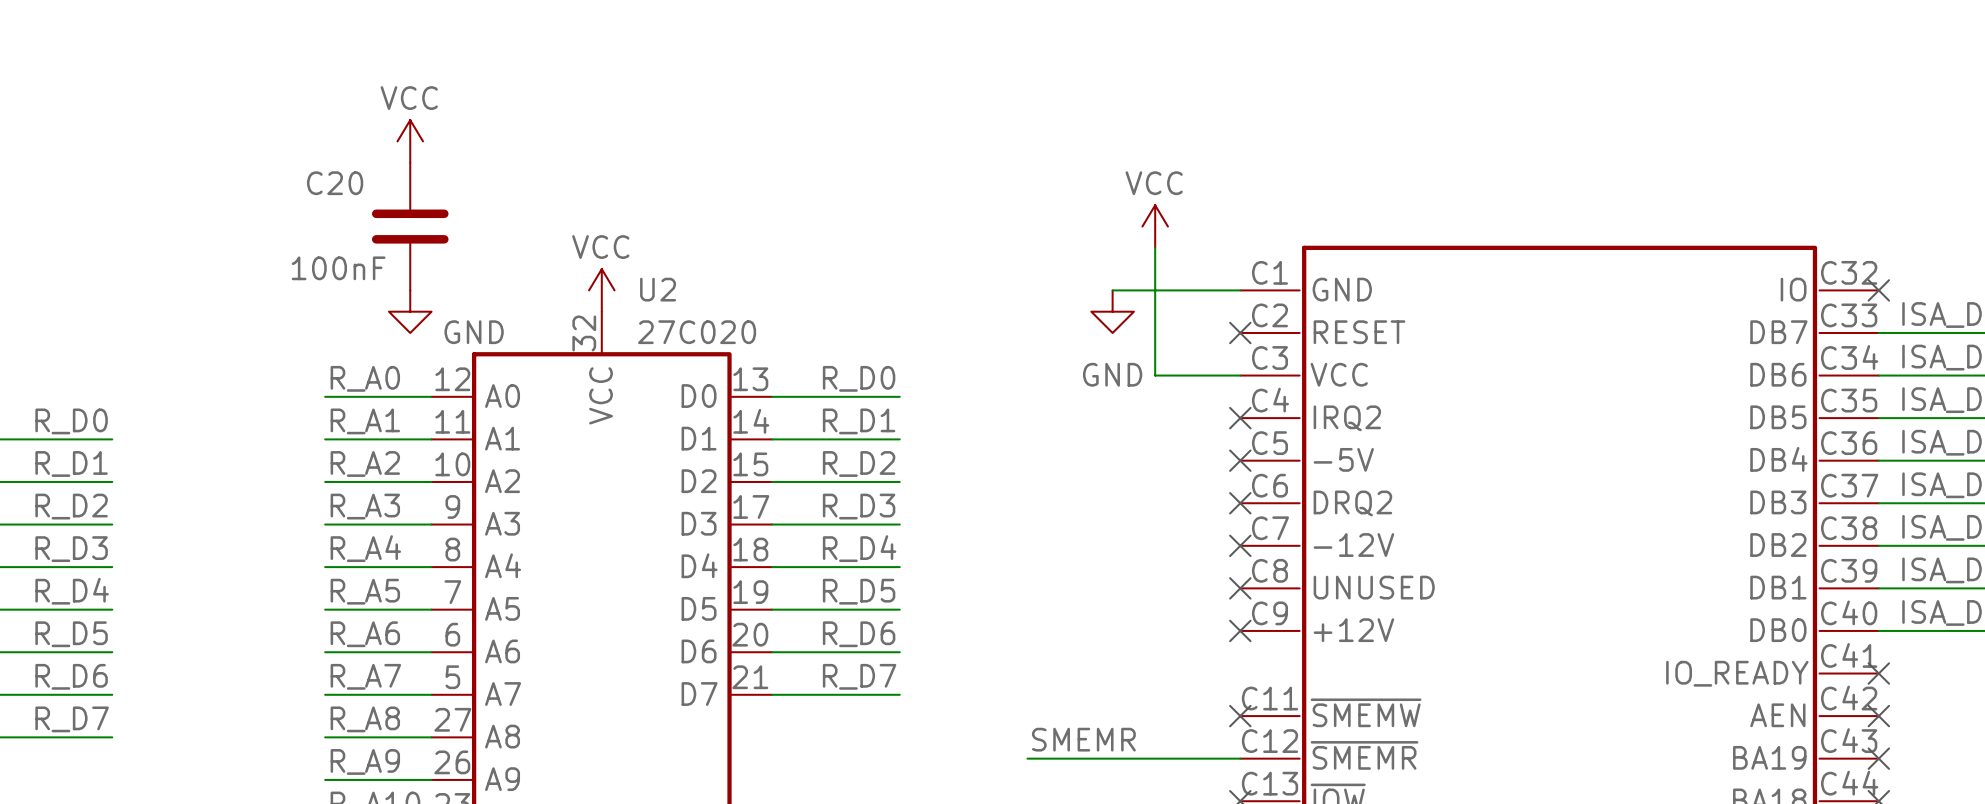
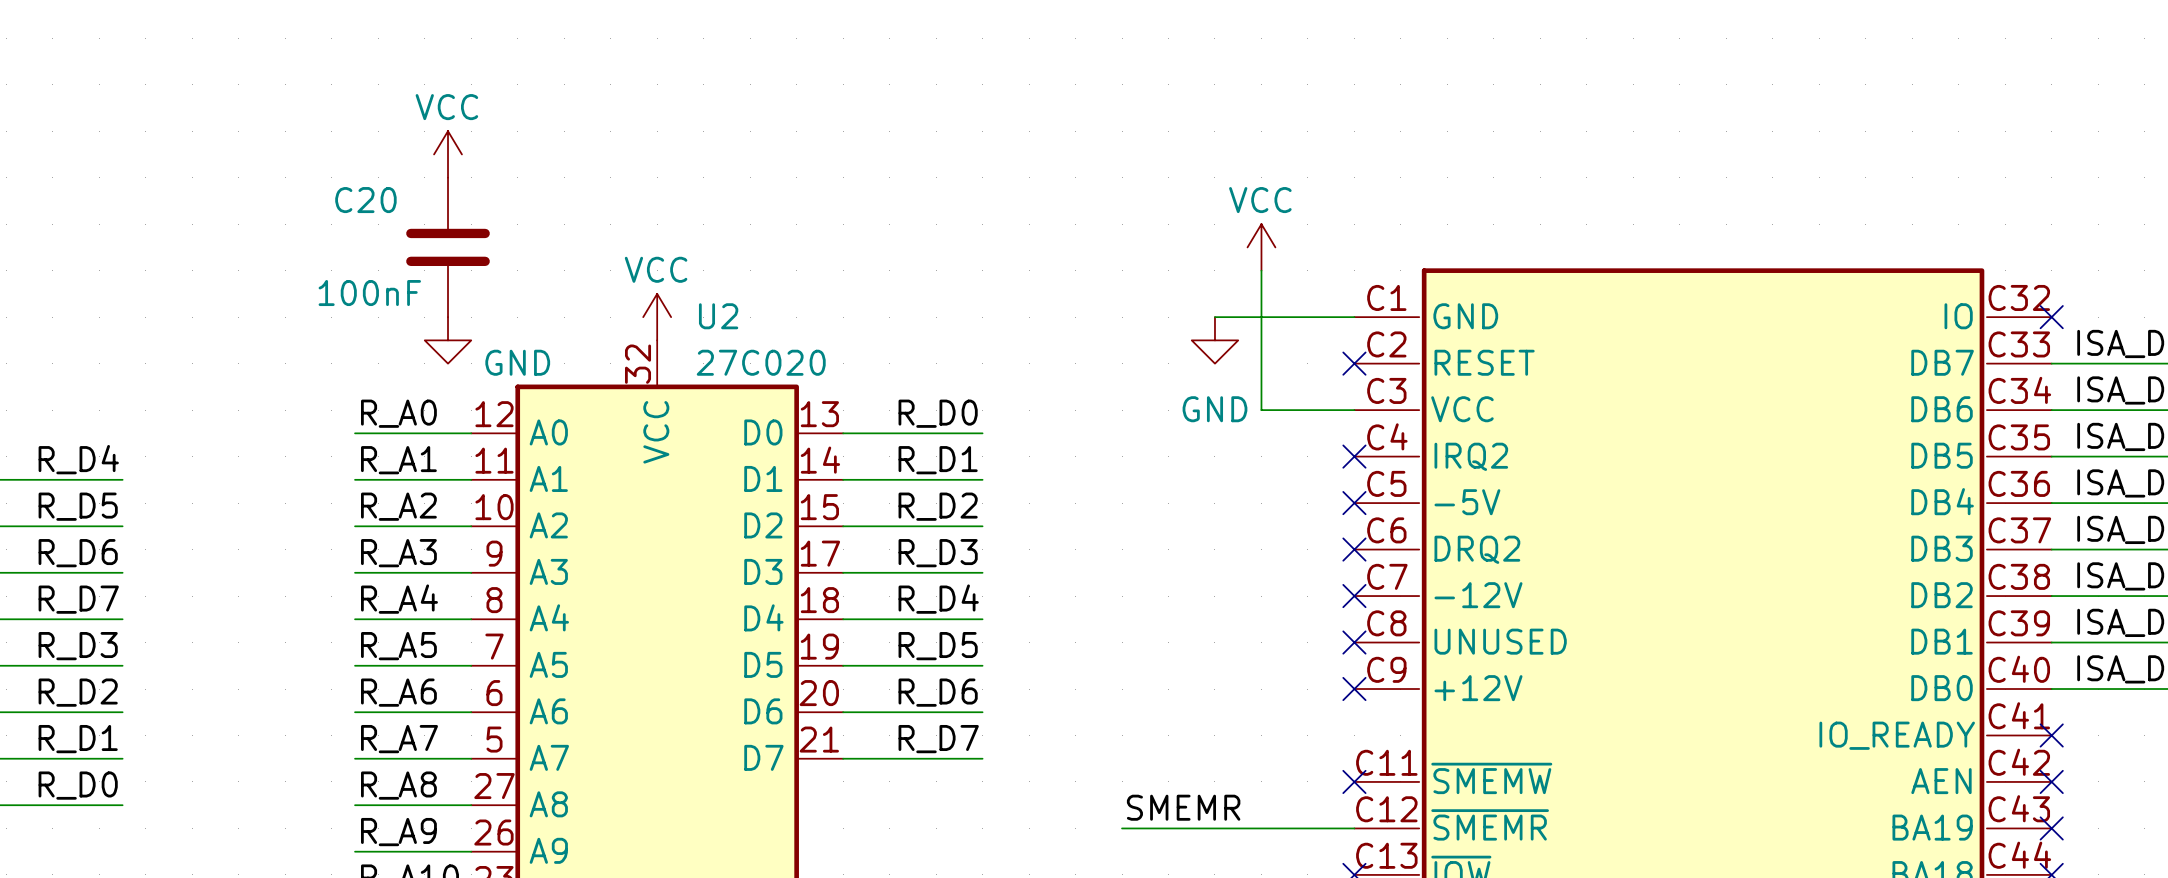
label: R_D0 (71, 421) -> R_D4 (78, 459)
label: R_D1 (71, 463) -> R_D5 (78, 506)
label: R_D2 (71, 506) -> R_D6 (78, 553)
label: R_D3 (71, 549) -> R_D7 (78, 599)
label: R_D4 (72, 591) -> R_D3 (78, 646)
label: R_D5 (71, 634) -> R_D2 (78, 692)
label: R_D6 (71, 676) -> R_D1 (78, 739)
label: R_D7 (72, 719) -> R_D0 (78, 785)

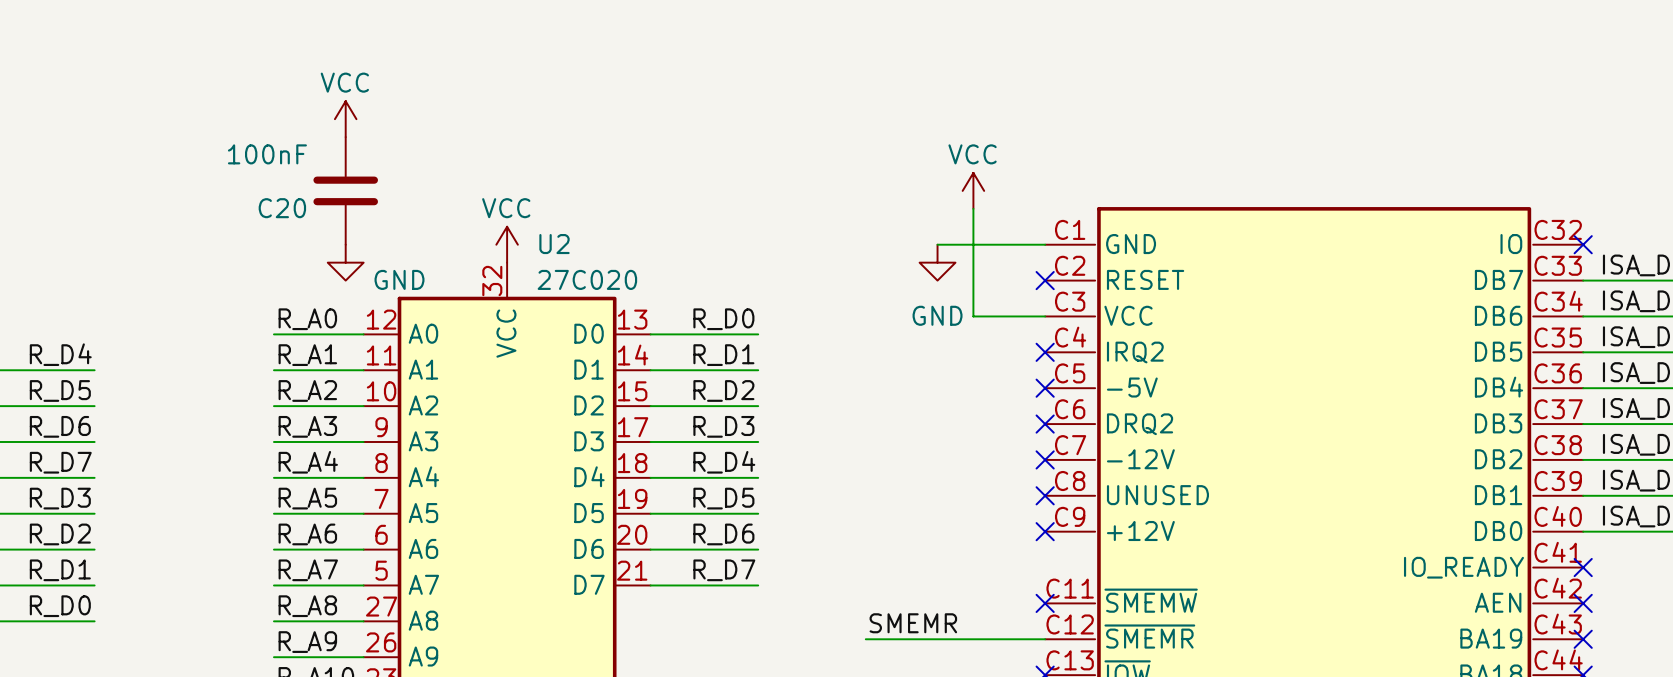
C20 name position: C20 (365, 200) -> C20 (282, 208)
C20 value position: 100nF (369, 293) -> 100nF (267, 154)

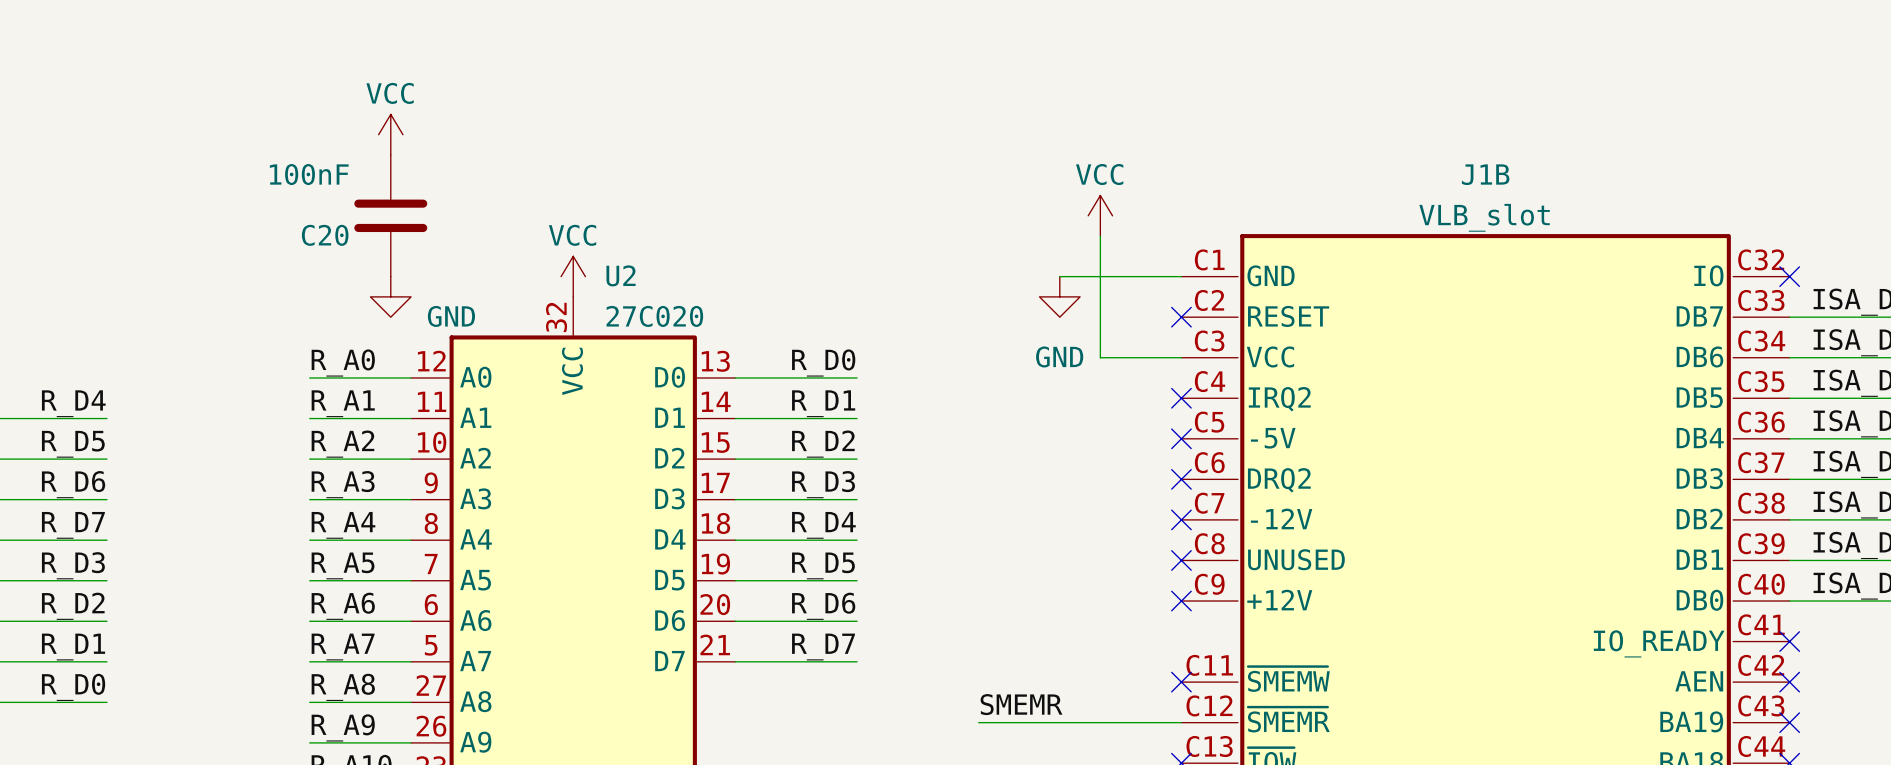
J1B name: none -> J1B (1485, 174)
J1B value: none -> VLB_slot (1484, 217)

